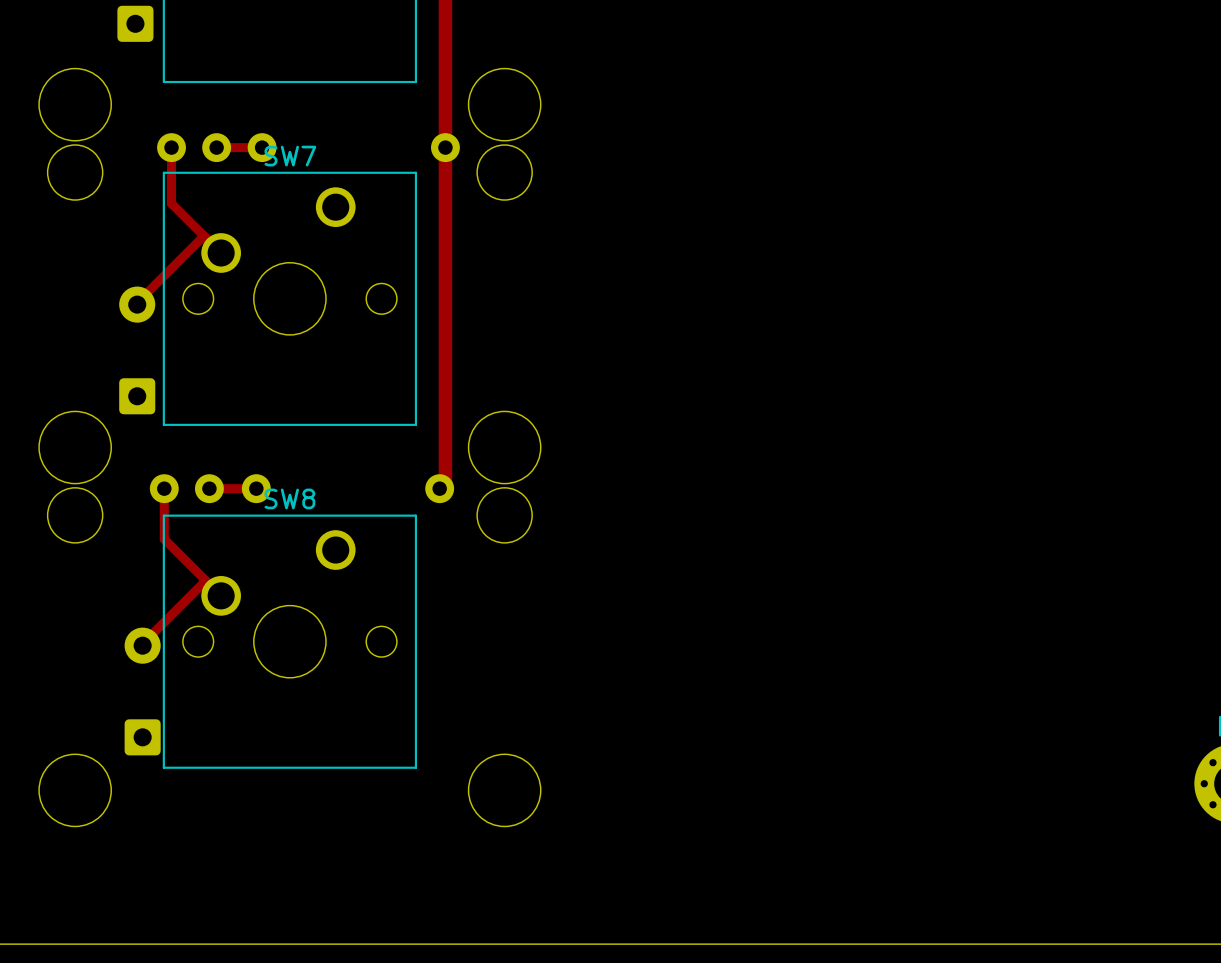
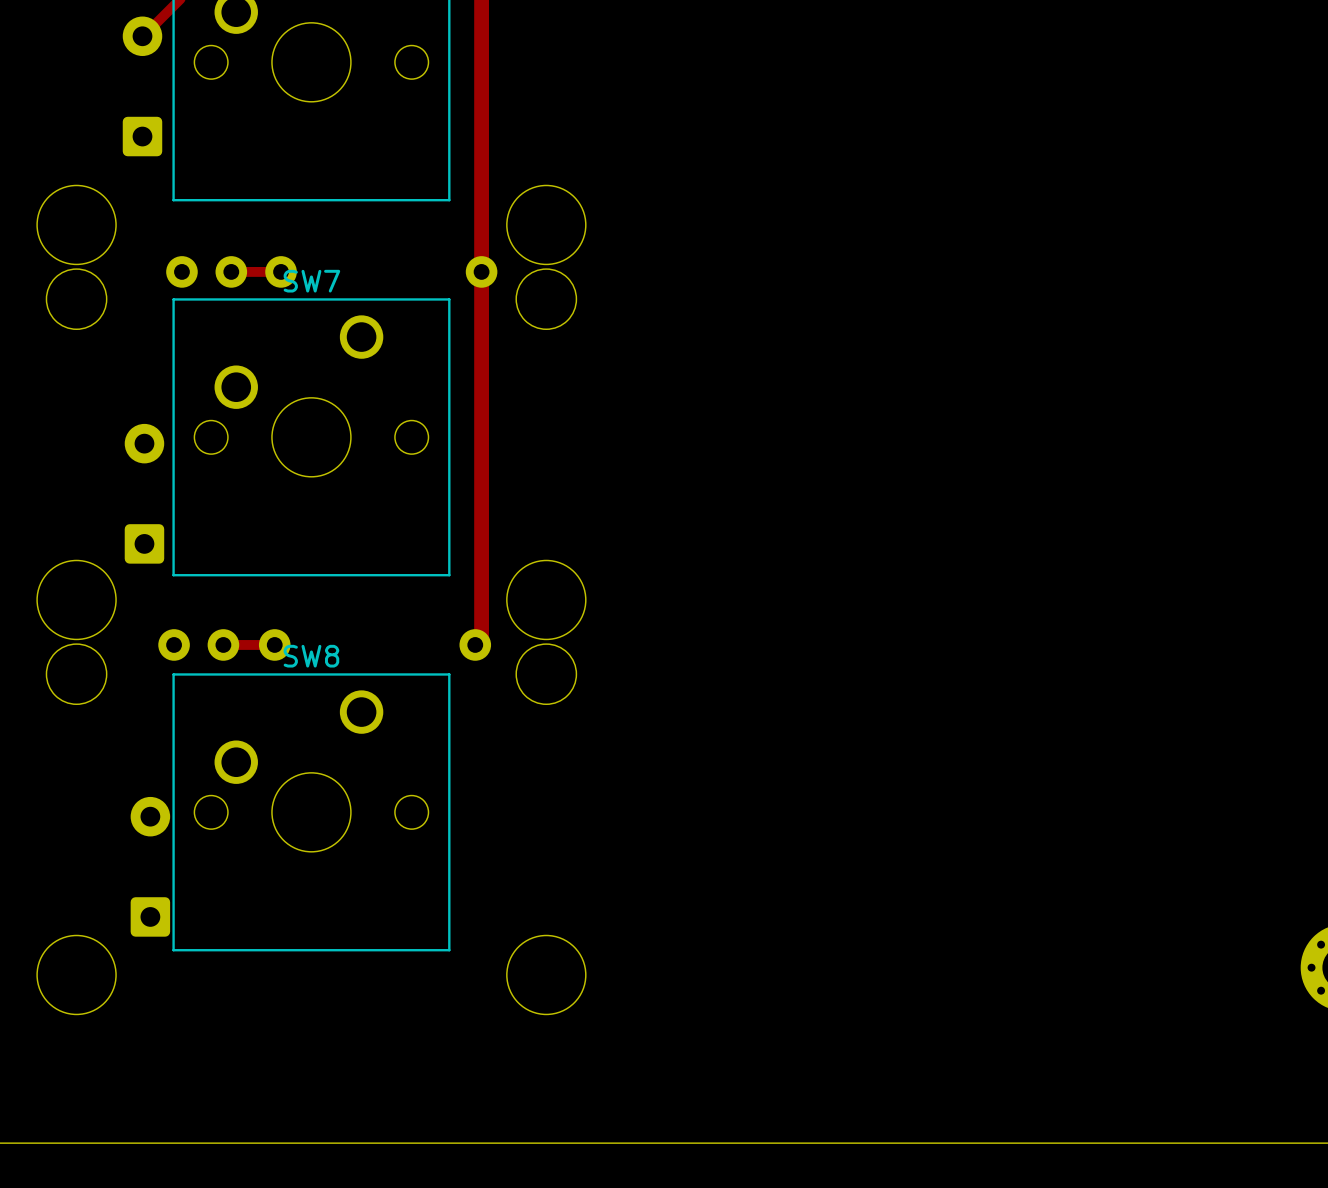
track: (171, 147) (171, 203) (220, 252) -> none
track: (204, 236) (137, 302) -> none
track: (164, 488) (164, 539) (220, 595) -> none
track: (205, 580) (142, 643) -> none

